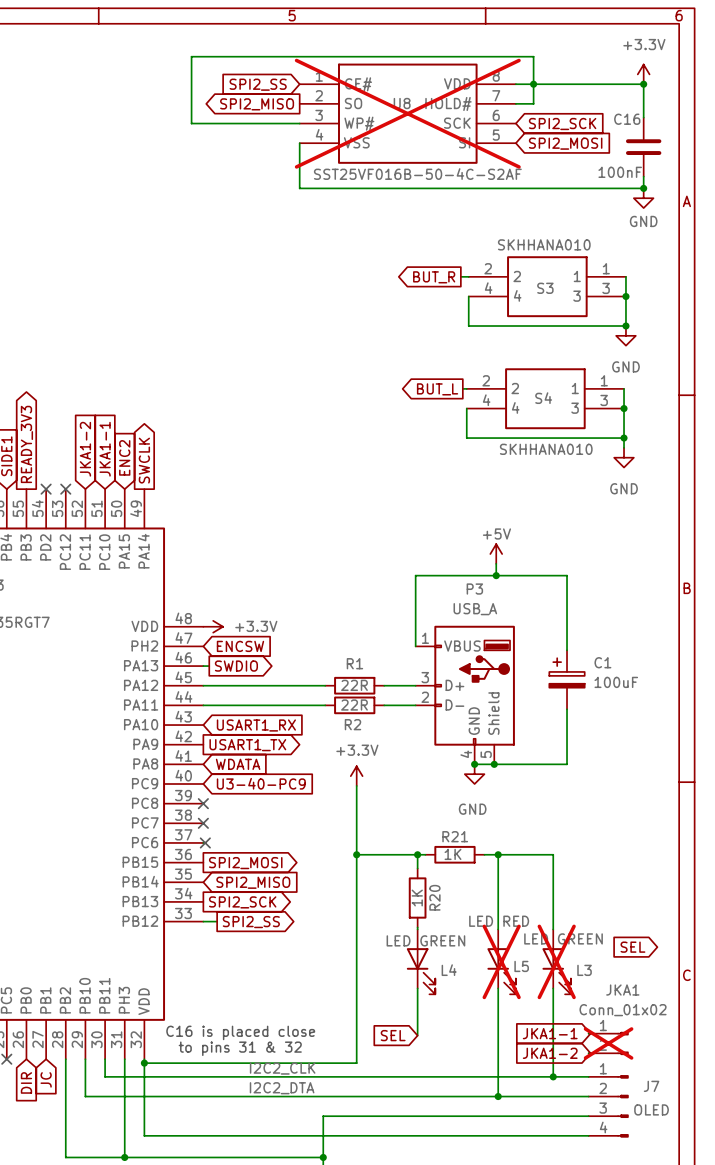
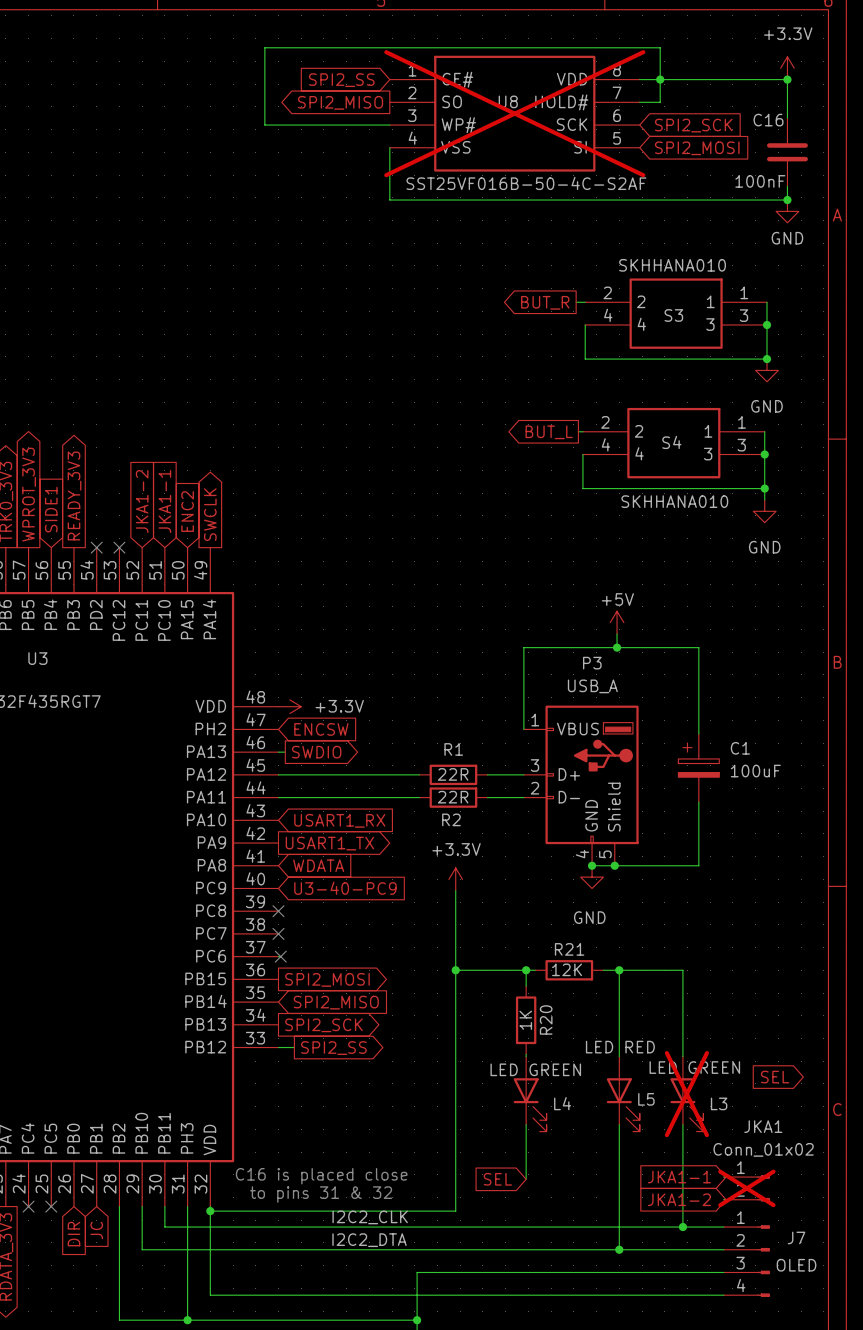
R21 value: 1K (453, 854) -> 12K (567, 969)
L5 do-not-place cross: (501, 961) -> none

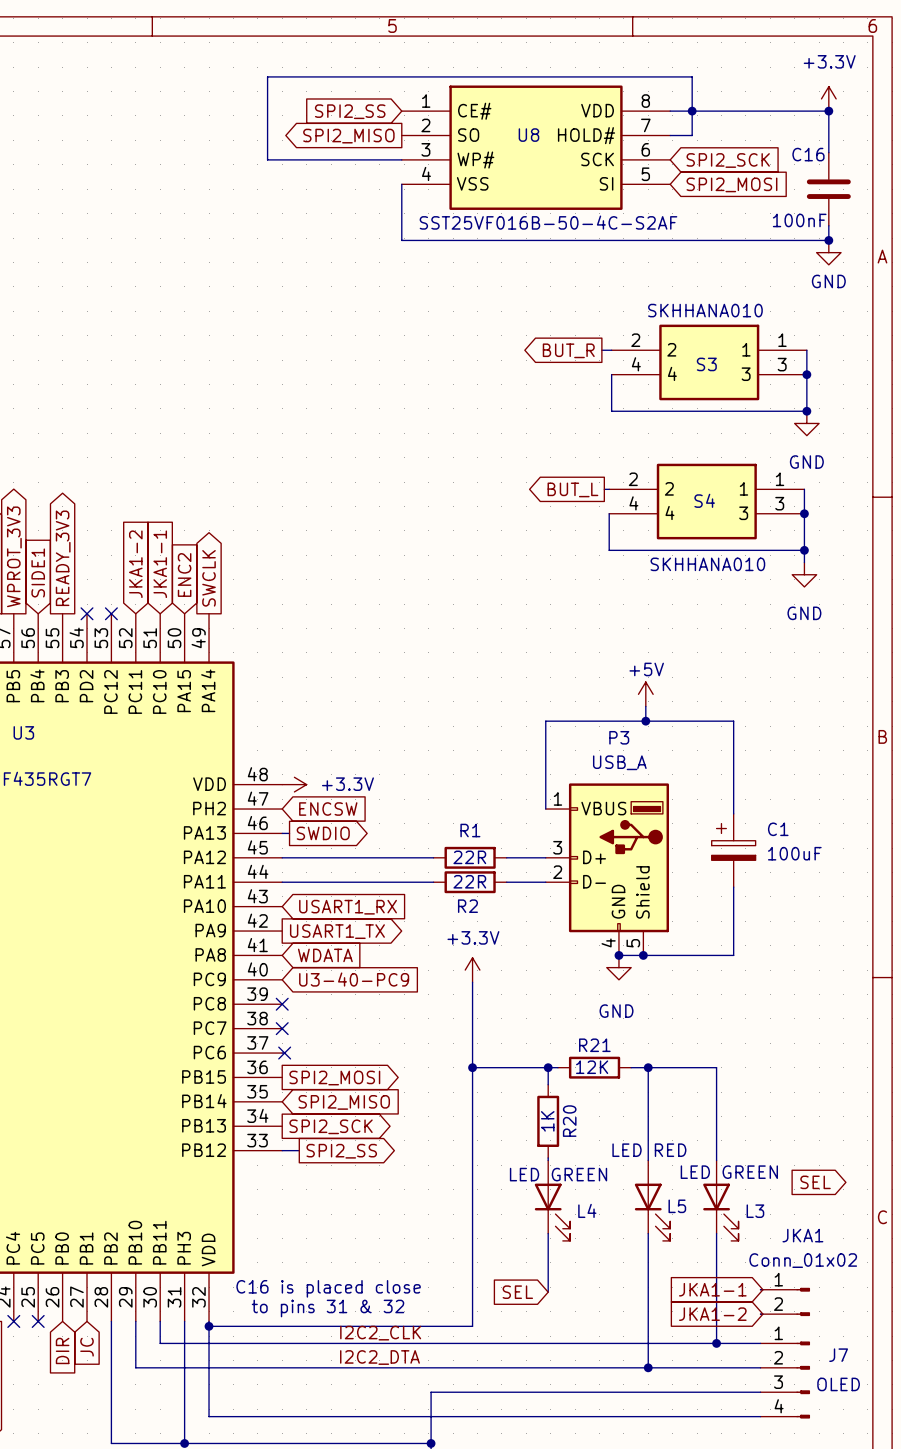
U8 do-not-place cross: (514, 113) -> none
L3 do-not-place cross: (686, 1094) -> none
JKA1 do-not-place cross: (746, 1188) -> none

